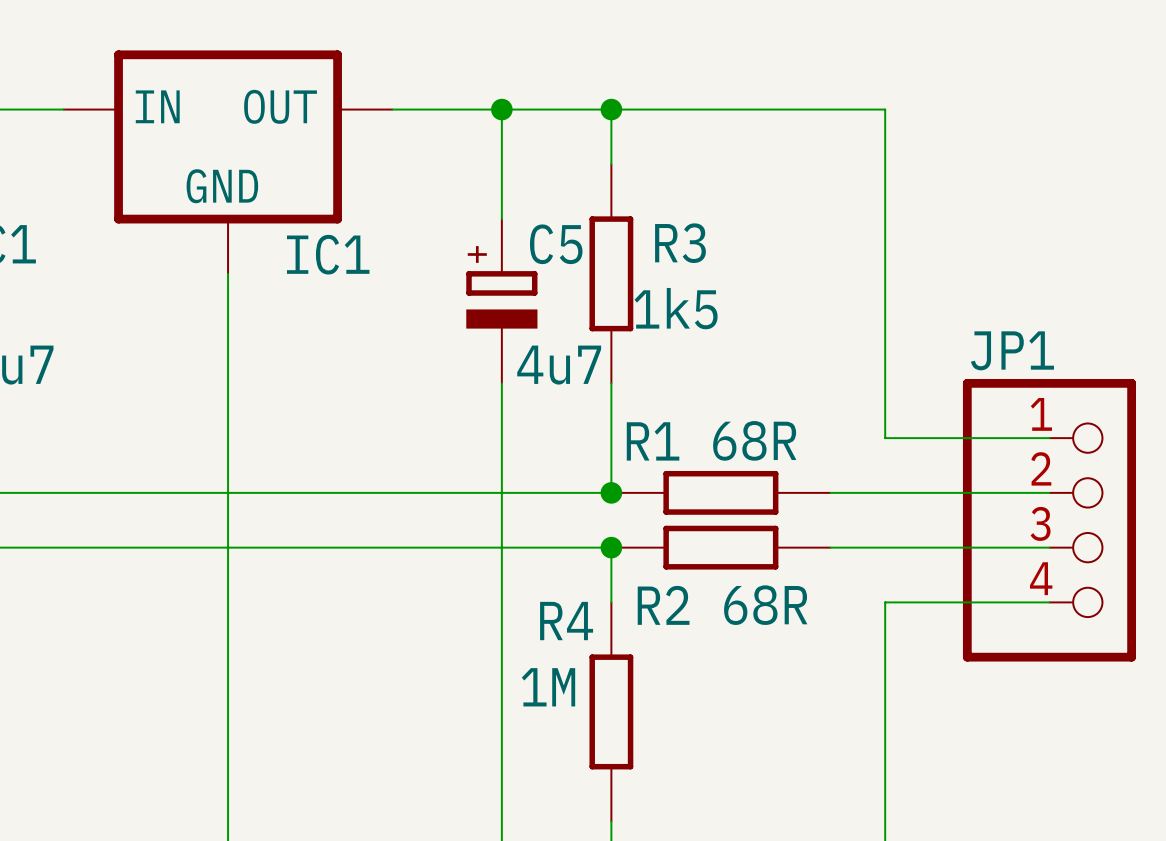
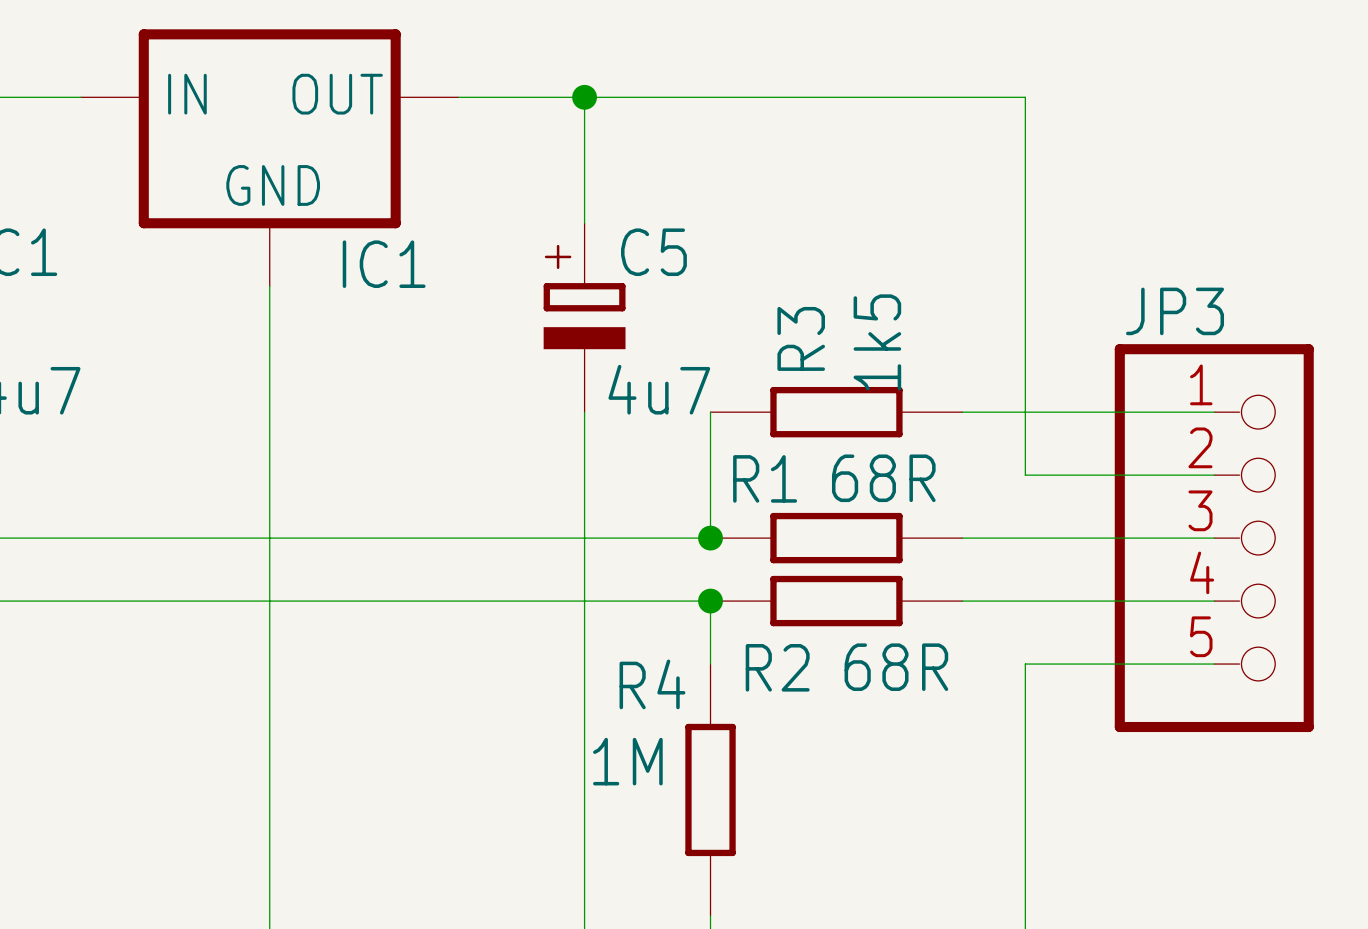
wire: (611, 109) (611, 164) -> none
junction: (611, 109) -> none
R3 name position: R3 (680, 243) -> R3 (801, 338)
R3 rotation: 0° (611, 273) -> 90° clockwise (836, 412)
R3 position: (611, 273) -> (836, 412)
R3 value position: 1k5 (676, 308) -> 1k5 (877, 342)
wire: none -> (962, 412) (1214, 412)
JP3: none -> (1214, 538)
JP1: (1049, 520) -> none

